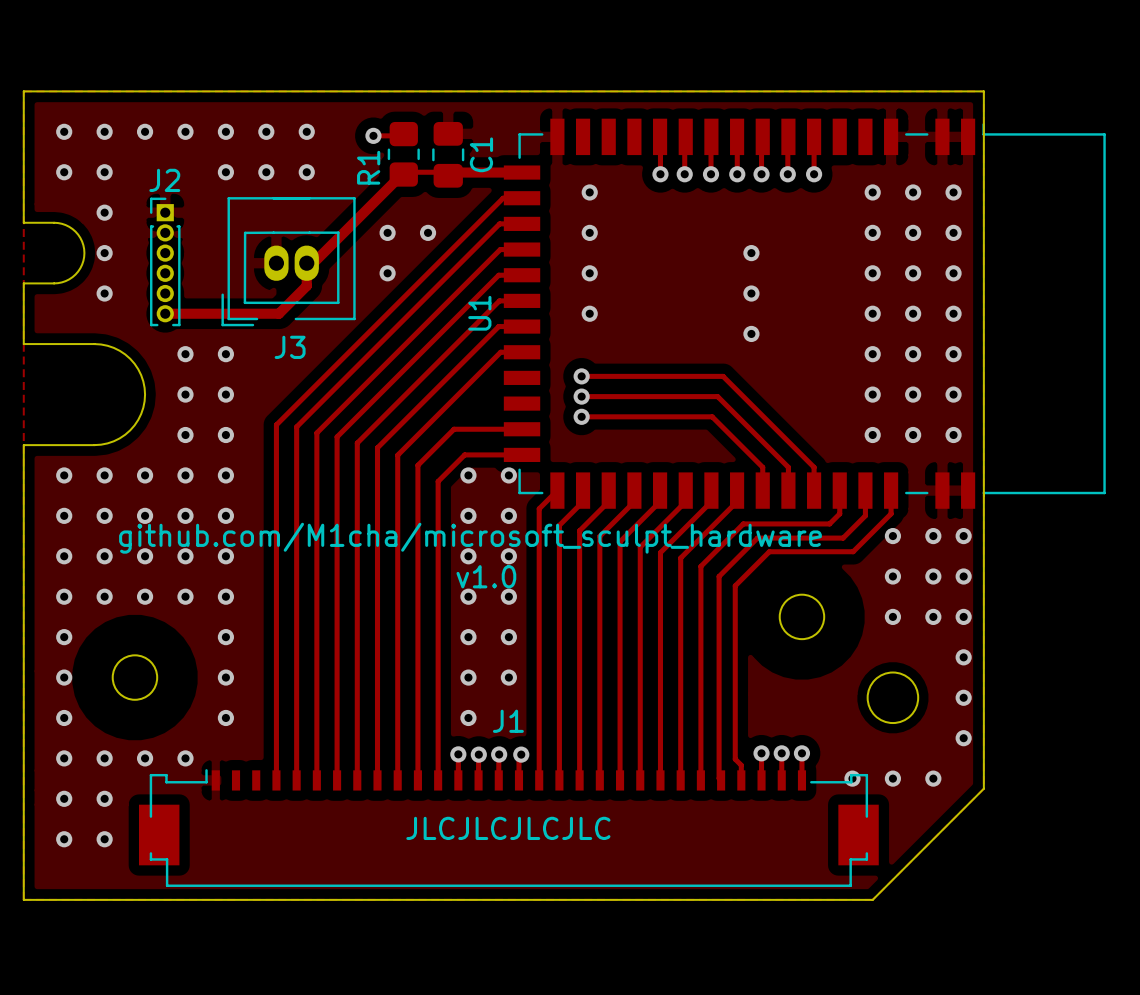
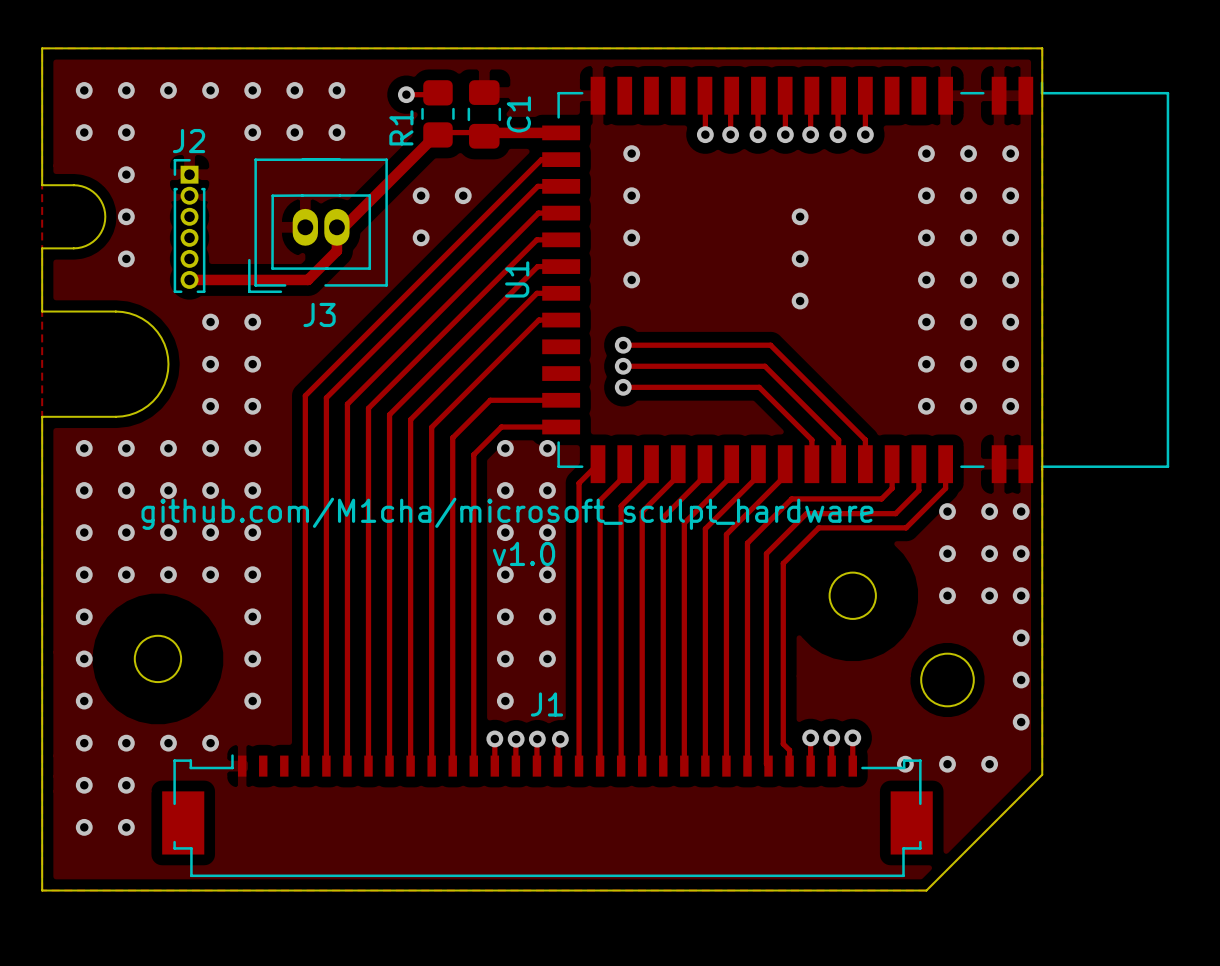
text: JLCJLCJLCJLC (508, 828) -> none

